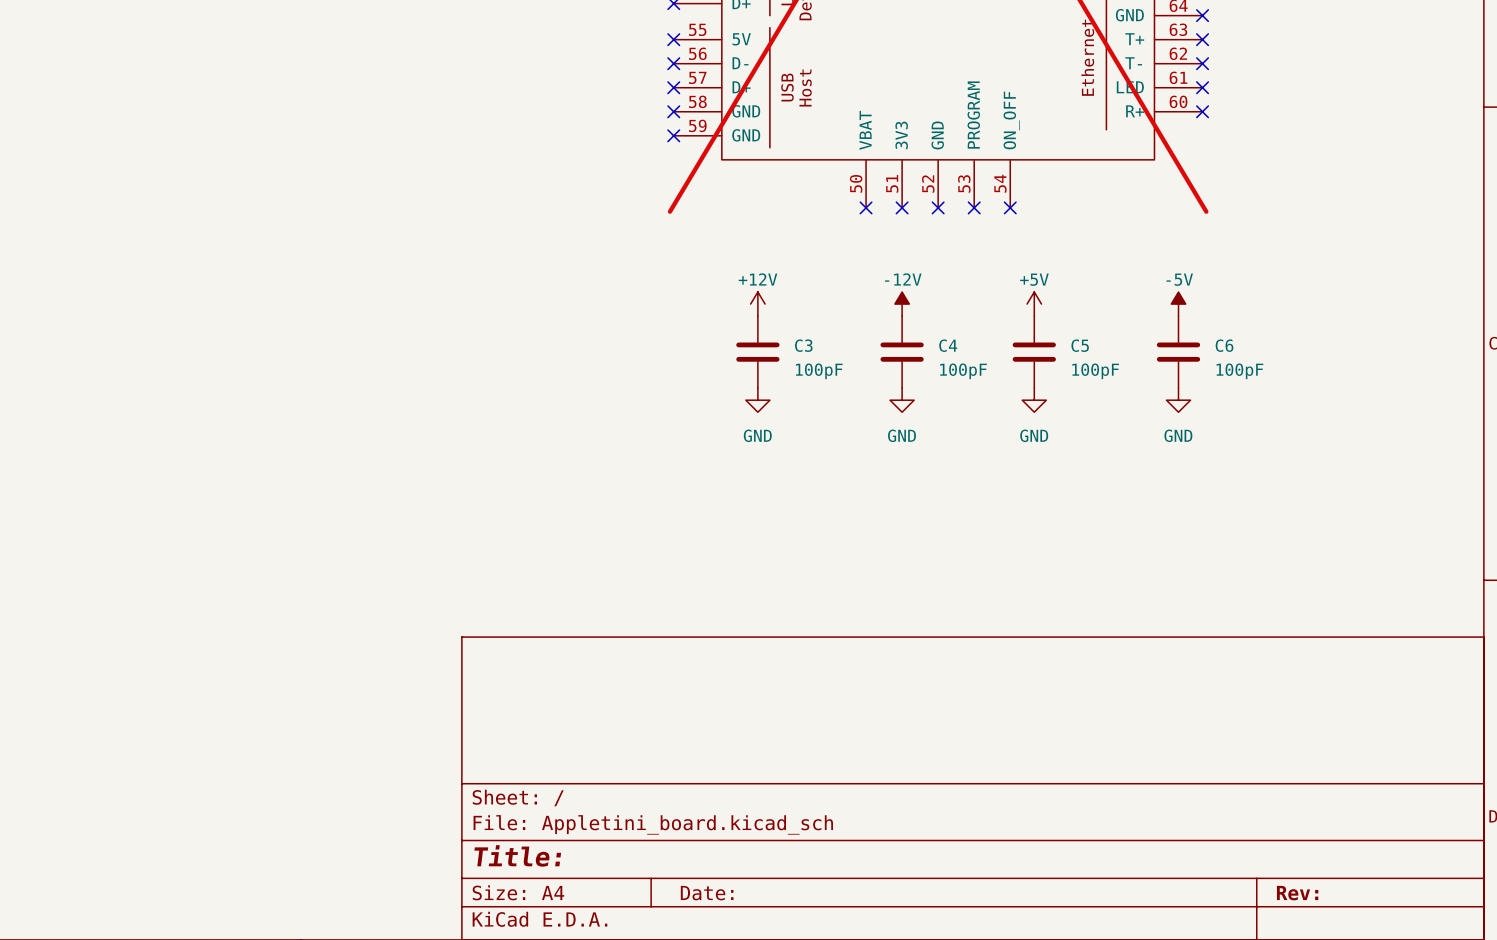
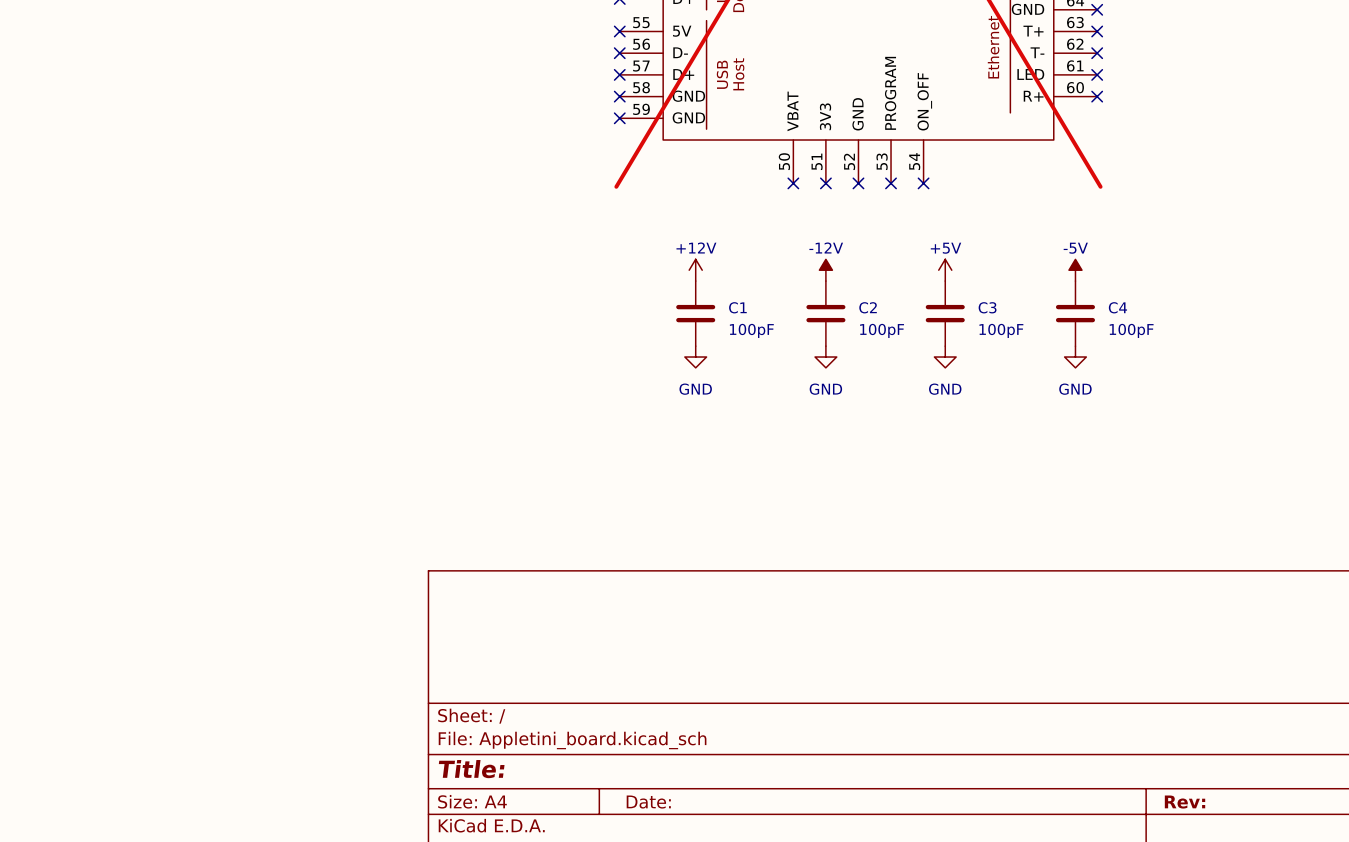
C3 name: C3 (803, 345) -> C1 (737, 307)
C4 name: C4 (948, 345) -> C2 (868, 307)
C5 name: C5 (1080, 345) -> C3 (987, 307)
C6 name: C6 (1224, 345) -> C4 (1117, 307)

